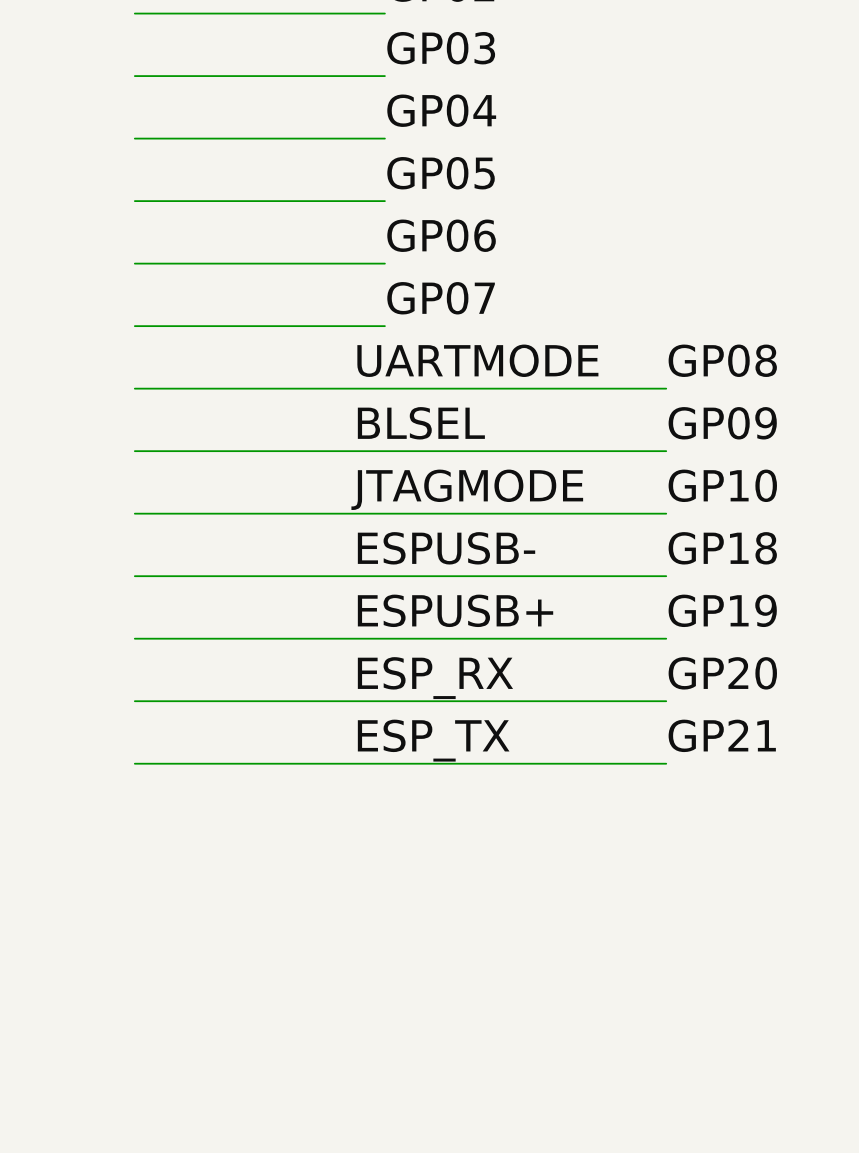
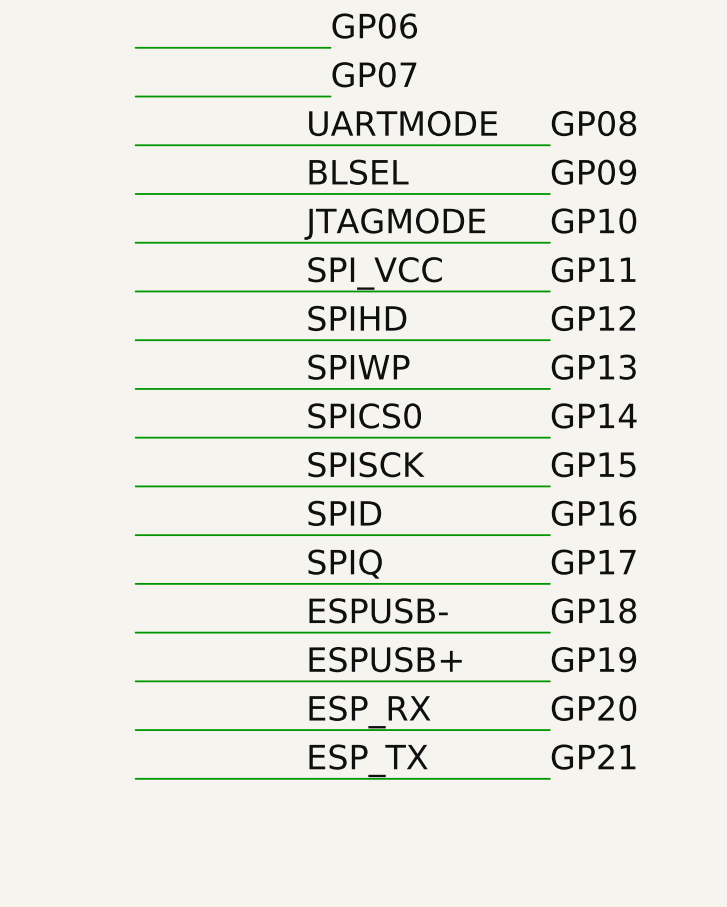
label: GP03 (441, 48) -> GP06 (374, 26)
label: GP04 (441, 110) -> GP07 (374, 74)
label: GP05 (441, 173) -> none
label: none -> UARTMODE (403, 123)
label: none -> GP08 (593, 123)
wire: none -> (330, 145) (549, 145)
label: none -> BLSEL (359, 172)
label: GP06 (441, 235) -> none
label: none -> GP09 (593, 172)
wire: none -> (330, 193) (549, 193)
label: GP07 (441, 298) -> none
label: none -> GP10 (594, 221)
label: none -> JTAGMODE (394, 224)
wire: none -> (330, 242) (549, 242)
label: UARTMODE (477, 360) -> SPI_VCC (375, 273)
label: GP08 (722, 360) -> GP11 (593, 269)
label: BLSEL (421, 423) -> SPIHD (357, 318)
label: GP09 (722, 423) -> GP12 (593, 318)
label: GP10 (722, 485) -> GP13 (593, 367)
label: JTAGMODE (467, 489) -> SPIWP (358, 367)
label: ESPUSB- (446, 548) -> SPICS0 (364, 415)
label: GP18 (722, 548) -> GP14 (594, 415)
label: ESPUSB+ (455, 610) -> SPISCK (366, 464)
label: GP19 (722, 610) -> GP15 (593, 464)
label: GP20 (722, 673) -> GP16 (594, 513)
label: ESP_RX (435, 678) -> SPID (344, 513)
label: GP21 (722, 735) -> GP17 (593, 562)
label: ESP_TX (433, 740) -> SPIQ (345, 564)
label: none -> ESPUSB- (378, 610)
label: none -> GP18 (593, 610)
wire: none -> (135, 632) (549, 632)
label: none -> ESPUSB+ (385, 659)
label: none -> GP19 (593, 659)
wire: none -> (135, 681) (549, 681)
label: none -> GP20 (594, 708)
label: none -> ESP_RX (369, 712)
wire: none -> (135, 730) (549, 730)
label: none -> GP21 (593, 757)
label: none -> ESP_TX (368, 760)
wire: none -> (135, 778) (549, 778)

